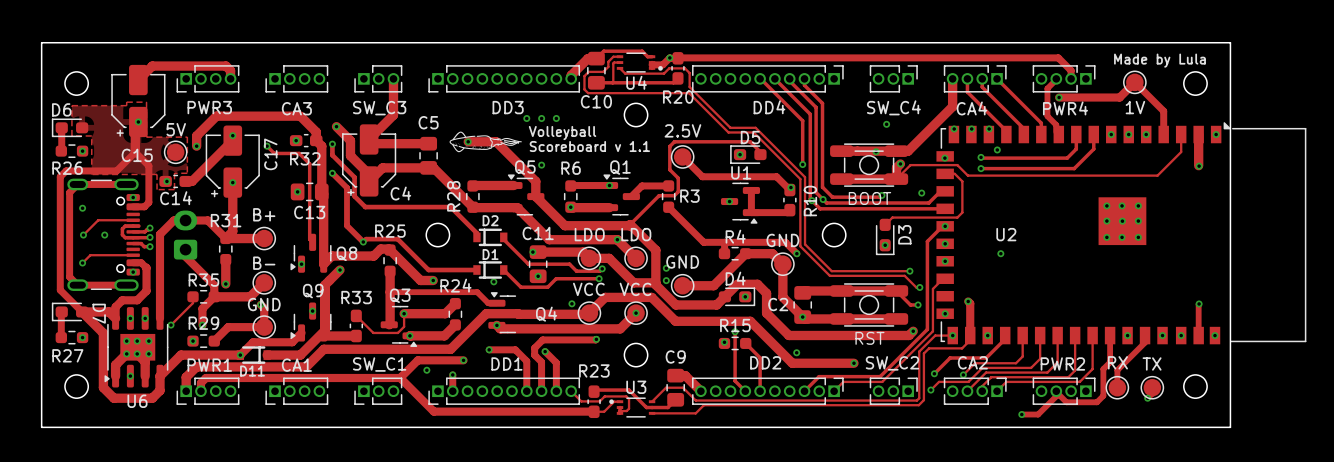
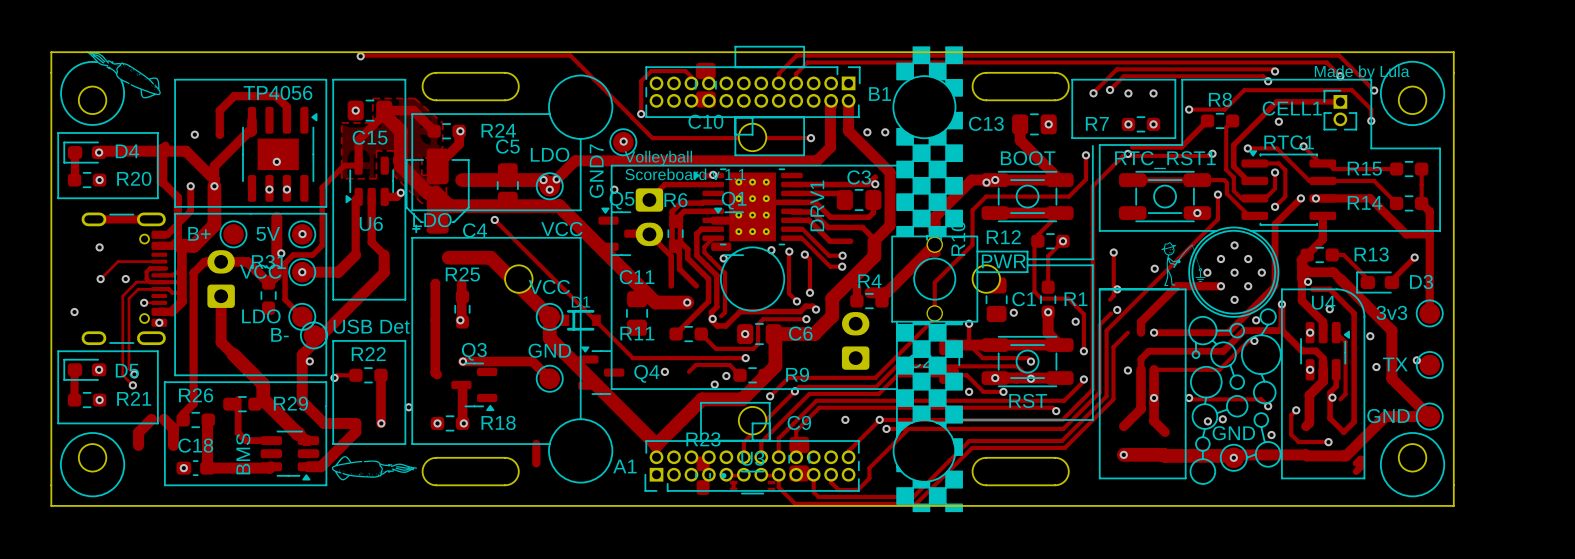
drawing: none -> [892, 46, 963, 237]
line: none -> (735, 46) (735, 67) (804, 67) (804, 46) (735, 46)
drawing: none -> [86, 51, 161, 99]
track: none -> (360, 55) (570, 55) (652, 138) (811, 138)
via: none -> (360, 56)
drawing: none -> [1380, 61, 1445, 126]
line: none -> (97, 62) (85, 62) (74, 67) (62, 83) (62, 102) (73, 118) (92, 125) (110, 119) (119, 110) (123, 99) (121, 80)
U4 footprint: [616, 52, 663, 73] -> [1300, 321, 1350, 381]
track: (620, 56) (613, 56) (603, 71) (588, 71) (584, 76) (584, 89) (588, 93) (689, 93) (728, 132) (753, 132) (800, 179) (800, 246) (829, 275) (904, 275) (916, 287) (919, 287) -> none
track: (652, 56) (647, 56) (642, 51) (603, 51) (596, 58) (587, 58) (571, 75) (571, 78) -> none
via: (669, 57) -> none
track: none -> (1275, 71) (1273, 69) (1116, 69) (1093, 93)
via: none -> (1275, 71)
board edge: none -> (436, 72) (508, 73) (516, 79) (518, 90) (514, 96) (506, 100) (432, 99) (425, 94) (422, 84) (426, 76) (436, 72)
board edge: none -> (986, 72) (1058, 73) (1066, 79) (1068, 90) (1064, 96) (1056, 100) (982, 99) (975, 94) (972, 84) (976, 76) (986, 72)
drawing: none -> [548, 74, 614, 140]
track: (620, 62) (613, 63) (612, 82) -> none
track: none -> (1340, 76) (1326, 62) (807, 62) (796, 73) (796, 83)
via: none -> (1340, 76)
C15 footprint: [111, 64, 166, 138] -> [347, 99, 393, 122]
track: (652, 64) (662, 64) (669, 57) (1058, 57) (1071, 70) (1071, 78) -> none
line: none -> (175, 79) (326, 79) (326, 206) (175, 206) (175, 79)
line: none -> (333, 79) (405, 79) (405, 299) (333, 299) (333, 79)
line: none -> (1072, 79) (1175, 79) (1175, 138) (1072, 138) (1072, 79)
track: none -> (1268, 81) (1263, 76) (1123, 76) (1110, 90)
via: none -> (1268, 81)
track: (620, 68) (625, 73) (663, 73) (669, 68) (684, 68) (689, 73) (689, 87) (730, 127) (755, 127) (805, 177) (805, 244) (831, 271) (909, 271) -> none
R20: (677, 68) -> none
track: none -> (691, 83) (691, 77) (685, 71) (651, 71) (641, 81) (641, 114)
track: none -> (778, 83) (778, 73) (796, 55) (1339, 55) (1374, 91)
via: none -> (1110, 90)
via: none -> (1374, 90)
B1: none -> (753, 92)
via: none -> (1093, 93)
via: none -> (1128, 93)
via: none -> (1153, 93)
PWR3: (207, 78) -> none
track: (230, 78) (230, 70) (225, 66) (152, 66) (138, 80) -> none
CA3: (296, 78) -> none
SW_C3: (378, 78) -> none
track: (393, 78) (393, 115) (369, 139) (373, 143) (428, 143) -> none
DD3: (504, 78) -> none
track: (677, 78) (673, 82) (596, 82) -> none
track: (760, 78) (802, 120) (802, 164) -> none
DD4: (767, 78) -> none
track: (774, 78) (810, 114) (810, 198) (820, 208) (945, 208) -> none
track: (789, 78) (816, 107) (816, 192) (826, 202) (928, 202) (940, 191) (945, 191) -> none
track: (804, 78) (804, 85) (822, 103) (822, 176) -> (1085, 155) (1085, 179) (1068, 196) (986, 196) (972, 210)
SW_C4: (893, 78) -> none
track: (952, 78) (952, 106) (908, 151) (896, 151) -> (1020, 124) (1020, 140) (1059, 180)
track: (967, 78) (967, 92) (1006, 131) (1006, 134) -> none
CA4: (975, 78) -> none
track: (982, 78) (982, 87) (1023, 128) (1023, 134) -> none
track: (997, 78) (1041, 123) (1041, 134) -> none
track: (1056, 78) (1047, 88) (1047, 116) (1056, 125) (1056, 132) -> none
PWR4: (1064, 78) -> none
zone outline: none -> (372, 98) (372, 122) (341, 122) (341, 178) (376, 178) (376, 150) (393, 150) (393, 175) (421, 203) (446, 203) (446, 175) (421, 175) (421, 157) (432, 157) (442, 147) (442, 122) (414, 98) (372, 98)
U4 name position: U4 (636, 82) -> U4 (1323, 302)
1V: (1134, 82) -> none
track: none -> (831, 100) (830, 147) (817, 160) (575, 160) (549, 186) (543, 180) (462, 180)
track: none -> (848, 100) (848, 131) (890, 172) (890, 225) (874, 241)
track: none -> (1340, 101) (1276, 101) (1233, 145) (1233, 166) (1248, 180) (1254, 180)
track: none -> (1189, 109) (1224, 109) (1244, 90) (1352, 90) (1371, 109) (1371, 120)
via: none -> (1189, 109)
CELL1: none -> (1340, 110)
via: none -> (355, 110)
track: none -> (384, 114) (400, 131) (400, 165) (428, 193) (436, 193) (449, 206) (559, 206) (655, 302) (687, 302)
track: none -> (384, 114) (358, 140) (358, 165) (344, 165) (322, 187) (322, 245) (312, 255) (293, 255) (285, 263) (285, 299) (302, 316)
track: none -> (384, 114) (384, 110) (413, 110) (434, 131)
line: none -> (549, 114) (412, 114) (412, 210) (580, 210) (580, 138)
via: none -> (641, 114)
track: (1059, 97) (1119, 97) (1134, 82) (1163, 111) (1163, 134) -> none
via: (1059, 97) -> none
line: none -> (735, 117) (735, 155) (804, 155) (804, 117) (735, 117)
line: none -> (752, 117) (752, 134) (735, 134)
track: none -> (252, 120) (252, 131) (248, 131) (214, 166) (214, 186)
track: none -> (286, 120) (286, 106) (276, 96) (234, 96) (219, 110) (219, 134)
track: none -> (1207, 120) (1181, 146) (1132, 146)
R8: none -> (1220, 120)
track: none -> (1232, 120) (1226, 127) (1226, 169) (1233, 177) (1233, 190) (1241, 198) (1265, 198) (1275, 188) (1275, 172)
via: none -> (1278, 121)
via: none -> (1371, 120)
zone outline: (126, 102) (126, 105) (71, 105) (71, 135) (91, 135) (91, 174) (157, 174) (157, 189) (174, 189) (174, 173) (187, 173) (187, 137) (146, 137) (146, 102) (126, 102) -> none
via: none -> (1048, 124)
via: none -> (1128, 124)
R7: none -> (1140, 124)
via: none -> (1153, 124)
D6 name: D6 (61, 109) -> D4 (127, 151)
track: none -> (459, 131) (459, 144) (436, 167)
via: none -> (460, 131)
via: none -> (867, 132)
via: none -> (885, 132)
line: none -> (58, 132) (157, 132) (157, 198) (58, 198) (58, 132)
via: none -> (194, 134)
via: none -> (811, 138)
via: (541, 118) -> none
via: (556, 118) -> none
GND7: none -> (623, 142)
via: (138, 121) -> none
line: none -> (1092, 145) (1092, 259) (1027, 259)
track: none -> (1303, 146) (1320, 163) (1327, 163) (1333, 169) (1396, 169)
via: none -> (1303, 146)
via: (886, 124) -> none
track: none -> (1247, 148) (1276, 148) (1309, 180) (1374, 180) (1396, 203)
via: none -> (1247, 148)
track: (336, 126) (350, 140) (350, 155) (369, 174) (369, 181) (382, 167) (433, 167) (473, 207) (517, 207) (549, 239) (617, 239) (636, 258) -> none
via: (336, 126) -> none
track: none -> (99, 152) (185, 151) (214, 179) (214, 186)
via: none -> (99, 152)
via: (971, 128) -> none
via: (989, 128) -> none
track: none -> (1212, 153) (1210, 155) (1123, 155) (1092, 186) (1092, 389) (1062, 420) (879, 419) (848, 451) (848, 457)
via: none -> (1212, 153)
5V name position: 5V (176, 129) -> 5V (268, 233)
TP4056: none -> (279, 154)
via: none -> (1085, 155)
drawing: [449, 131, 522, 153] -> none
track: (1076, 134) (1076, 149) (1067, 158) (981, 157) -> none
track: (1093, 134) (1093, 149) (1074, 168) (981, 168) -> none
via: (1111, 134) -> none
via: (1128, 134) -> none
via: (1146, 134) -> none
track: (1181, 134) (1181, 152) (1157, 175) (967, 175) (957, 165) (910, 165) (896, 179) (896, 167) (900, 163) -> none
track: (1198, 134) (1199, 166) -> none
via: (1216, 134) -> none
track: none -> (1254, 163) (1278, 163) (1285, 170) (1285, 196) (1275, 206)
line: none -> (896, 165) (611, 165) (611, 389) (896, 389)
track: (232, 140) (191, 181) (185, 181) -> none
via: (296, 140) -> none
R32: (306, 140) -> none
track: (468, 141) (496, 141) (535, 181) (535, 196) (564, 225) (630, 224) -> none
via: (468, 141) -> none
track: none -> (1421, 169) (1421, 203) (1429, 211) (1429, 313)
track: (332, 144) (332, 155) (354, 177) (354, 196) (365, 207) (450, 207) (476, 233) (476, 237) -> none
via: (332, 144) -> none
via: none -> (1275, 172)
track: (196, 146) (196, 135) (216, 116) (300, 116) (316, 132) (316, 140) (321, 146) (323, 264) (331, 256) (373, 256) (380, 249) (389, 249) (420, 280) (433, 280) -> none
via: (196, 146) -> none
track: (267, 146) (274, 153) (299, 153) (309, 163) (309, 239) (312, 242) -> none
via: (267, 146) -> none
via: none -> (713, 174)
track: none -> (875, 177) (867, 184) (791, 184)
via: (997, 149) -> none
via: none -> (556, 179)
via: none -> (543, 180)
track: (759, 151) (750, 141) (674, 141) (669, 146) (669, 169) (678, 178) (678, 191) (674, 195) (659, 195) (630, 224) -> none
track: none -> (995, 180) (971, 180) (934, 217) (934, 244) (886, 292) (869, 292)
via: none -> (995, 180)
via: (876, 151) -> none
track: none -> (1132, 180) (1224, 180) (1226, 182) (1226, 193) (1249, 215) (1254, 215)
track: (135, 152) (116, 170) (66, 170) (60, 176) (60, 290) (82, 311) -> none
5V position: (175, 152) -> (302, 234)
via: none -> (986, 182)
track: none -> (713, 184) (664, 184) (649, 200)
D5: (748, 154) -> none
C15 name position: C15 (137, 155) -> C15 (370, 137)
track: none -> (190, 186) (190, 211) (167, 234) (159, 234)
via: none -> (190, 186)
via: none -> (214, 186)
LDO: none -> (549, 186)
track: (682, 156) (702, 176) (776, 176) (789, 190) -> none
2.5V: (682, 156) -> none
via: (981, 157) -> none
RTC1: none -> (1288, 188)
via: (944, 158) -> none
via: none -> (269, 189)
via: none -> (286, 189)
via: none -> (549, 189)
via: none -> (614, 189)
C17: (232, 161) -> none
track: none -> (400, 192) (396, 196) (384, 196)
via: none -> (400, 192)
track: none -> (791, 193) (838, 193) (844, 200)
via: (900, 163) -> none
track: none -> (1217, 194) (1217, 219) (1106, 330) (1106, 396) (1061, 441) (969, 441) (913, 496) (818, 496) (813, 492) (813, 474)
via: none -> (1217, 194)
via: (802, 164) -> none
track: none -> (358, 196) (355, 199) (355, 255) (338, 272) (302, 272)
track: none -> (371, 196) (371, 242) (384, 255) (384, 272) (302, 354) (302, 401) (324, 423) (355, 423) (355, 431) (321, 466) (308, 466)
via: (541, 165) -> none
RTC_RST1: none -> (1165, 196)
track: none -> (1300, 198) (1275, 224) (1275, 285) (1228, 332) (1154, 332)
via: none -> (1300, 198)
via: none -> (1315, 198)
track: none -> (1322, 198) (1370, 198) (1406, 234) (1429, 234)
via: (1199, 166) -> none
R26 name: R26 (67, 168) -> R20 (134, 178)
C3: none -> (859, 200)
track: none -> (873, 200) (873, 212) (868, 217) (830, 217) (815, 202) (757, 202) (739, 220) (713, 220)
via: (981, 168) -> none
track: none -> (713, 202) (680, 203) (672, 211) (672, 245) (679, 252) (679, 269) (696, 285)
R14: none -> (1409, 203)
track: (332, 173) (347, 187) (347, 225) (363, 242) (366, 239) (397, 239) (428, 270) (476, 270) -> none
via: (332, 173) -> none
DRV1: none -> (748, 206)
track: (945, 173) (954, 173) (962, 181) (962, 212) (957, 217) (892, 217) (885, 224) -> none
via: none -> (1275, 206)
track: none -> (713, 211) (684, 211) (680, 215) (680, 241) (687, 249) (687, 258) (708, 278) (708, 301) (676, 334)
track: none -> (791, 211) (812, 212) (828, 227) (862, 227) (874, 241)
line: none -> (175, 213) (326, 213) (326, 375) (175, 375) (175, 213)
track: none -> (1059, 213) (1037, 235) (1037, 241) (1034, 244) (1034, 291) (1041, 298) (1068, 298) (1083, 314) (1083, 351)
via: none -> (1197, 213)
via: (166, 181) -> none
C14: (175, 181) -> none
track: none -> (1322, 215) (1322, 239) (1301, 260) (1301, 300) (1323, 321) (1323, 332)
via: (232, 182) -> none
part: none -> (649, 217)
track: (77, 184) (69, 192) (69, 277) (77, 285) (126, 285) -> none
track: none -> (494, 219) (632, 358) (745, 358)
via: none -> (494, 219)
text: none -> LDO (432, 220)
track: (513, 185) (472, 185) -> none
track: (609, 185) (570, 185) -> none
via: (609, 185) -> none
track: (668, 185) (642, 185) (631, 196) -> none
track: none -> (791, 220) (809, 220) (830, 241) (850, 241)
via: (790, 187) -> none
track: (822, 187) (832, 197) (880, 197) (881, 195) -> (972, 222) (972, 244) (934, 282) (934, 318) (875, 377) (788, 377) (770, 396)
track: (751, 190) (751, 212) (787, 212) (789, 210) -> none
drawing: none -> [1161, 226, 1282, 485]
via: (297, 191) -> none
C13 position: (309, 191) -> (1034, 124)
text: none -> VCC (561, 229)
track: none -> (713, 229) (701, 229) (696, 233) (696, 255) (706, 265)
track: none -> (791, 229) (802, 229) (829, 255) (842, 255)
via: (921, 193) -> none
line: none -> (1216, 230) (1099, 230) (1099, 145) (1182, 145) (1182, 79) (1371, 79) (1371, 148) (1440, 148) (1440, 230) (1250, 230)
via: (881, 195) -> none
via: none -> (302, 234)
R28: (472, 196) -> none
R3: (668, 196) -> none
via: (133, 197) -> none
track: none -> (649, 234) (671, 256) (671, 285)
BOOT name position: BOOT (869, 198) -> BOOT (1028, 158)
via: (823, 199) -> none
track: none -> (713, 238) (704, 246) (704, 252) (709, 258)
track: none -> (791, 238) (801, 238) (830, 266) (842, 266)
via: (812, 200) -> none
via: (729, 201) -> none
track: none -> (874, 241) (874, 256) (832, 298) (832, 316) (814, 334) (777, 334) (775, 335) (775, 366) (742, 399) (702, 399) (656, 444) (549, 338) (549, 316) (490, 257) (448, 257)
R12: none -> (1050, 241)
track: none -> (1062, 241) (1048, 256) (1048, 287)
via: none -> (1062, 241)
U1: (740, 203) -> none
via: (1106, 205) -> none
via: (1122, 205) -> none
via: (1138, 205) -> none
via: none -> (1234, 245)
track: (570, 207) (609, 207) -> none
via: (570, 207) -> none
drawing: none -> [720, 246, 785, 312]
track: (668, 207) (703, 242) (785, 242) (796, 253) -> none
via: none -> (771, 250)
track: none -> (789, 251) (789, 293) (796, 301)
via: none -> (789, 251)
line: none -> (977, 251) (1027, 251) (1027, 272) (977, 272)
C13 name position: C13 (309, 212) -> C13 (986, 123)
track: none -> (1113, 252) (1113, 296) (1110, 299)
via: none -> (1113, 252)
via: none -> (281, 253)
B+ name position: B+ (264, 214) -> B+ (199, 233)
track: none -> (804, 254) (809, 259) (809, 292)
via: none -> (804, 254)
R13: none -> (1319, 255)
track: none -> (1332, 255) (1343, 255) (1367, 279) (1367, 282)
via: none -> (842, 255)
track: none -> (1414, 257) (1391, 282)
via: none -> (1414, 257)
track: none -> (710, 258) (725, 273) (725, 312) (721, 316)
via: none -> (723, 258)
via: none -> (1220, 259)
via: none -> (1248, 259)
track: (173, 220) (159, 234) (159, 318) -> (207, 261) (204, 261) (193, 272) (193, 403) (183, 414) (183, 419)
via: (1106, 221) -> none
via: (1122, 221) -> none
via: (1138, 221) -> none
track: none -> (706, 265) (716, 275) (716, 306) (711, 312) (711, 320) (717, 325) (725, 325) (740, 311) (800, 311) (805, 306) (812, 306) (816, 309)
line: none -> (1027, 265) (1092, 265) (1092, 419) (962, 419)
track: (630, 224) (655, 250) (655, 284) (675, 304) (716, 304) (737, 284) (757, 284) (766, 293) (766, 313) (788, 335) (908, 335) (913, 331) -> none
via: none -> (842, 266)
track: (945, 226) (942, 226) (927, 241) (927, 329) (880, 376) (819, 376) (804, 391) -> none
via: (945, 226) -> none
via: none -> (1154, 268)
via: (150, 228) -> none
VCC: none -> (302, 272)
via: none -> (302, 272)
via: none -> (1207, 272)
via: none -> (1234, 272)
via: none -> (1261, 272)
U2: (1121, 233) -> none
PWR: none -> (934, 279)
track: none -> (1301, 279) (1301, 265) (1308, 272) (1333, 272) (1391, 330) (1391, 378) (1429, 416) (1385, 416) (1346, 455) (1236, 454) (1233, 457) (1231, 455) (1123, 454)
D3 rotation: 0° (885, 236) -> 90° clockwise (1377, 282)
D3 position: (885, 236) -> (1377, 282)
track: none -> (150, 282) (136, 282) (122, 296) (122, 375) (132, 385)
via: (150, 237) -> none
D2: (490, 237) -> none
track: (503, 237) (528, 264) (569, 264) (576, 271) (599, 271) (602, 268) -> none
via: (1122, 237) -> none
via: (1138, 237) -> none
track: (225, 238) (264, 238) -> none
B+ position: (264, 238) -> (233, 234)
track: none -> (435, 283) (435, 372) (437, 374)
track: none -> (461, 283) (460, 320)
via: (617, 239) -> none
track: none -> (1220, 286) (1176, 286) (1140, 321) (1140, 332)
via: none -> (1220, 286)
via: none -> (1248, 286)
via: (363, 242) -> none
track: none -> (159, 289) (138, 289) (129, 298) (129, 369) (134, 374)
line: none -> (1099, 289) (1185, 289) (1185, 478) (1099, 478) (1099, 289)
line: none -> (1281, 289) (1281, 478) (1364, 478) (1364, 316) (1361, 304) (1354, 295) (1343, 290) (1281, 289)
track: none -> (1312, 289) (1330, 289) (1354, 313) (1354, 421) (1343, 432) (1330, 418) (1330, 392) (1336, 386) (1336, 369)
via: (885, 245) -> none
via: (150, 246) -> none
via: none -> (809, 292)
via: (532, 252) -> none
track: (538, 252) (583, 252) (589, 258) (609, 258) (633, 282) (655, 282) -> none
C1: none -> (996, 299)
R1: none -> (1048, 299)
via: none -> (1234, 299)
Q8: (310, 253) -> none
via: (796, 253) -> none
via: (1000, 253) -> none
via: none -> (687, 302)
via: none -> (796, 301)
track: (120, 255) (90, 255) (82, 263) -> none
via: none -> (144, 302)
track: (185, 256) (214, 285) (214, 296) -> (221, 304) (221, 342) (263, 384) (263, 399) (297, 433) (308, 440)
track: none -> (1281, 304) (1281, 330)
via: none -> (1281, 304)
LDO: (589, 258) -> none
LDO: (636, 258) -> none
track: (225, 259) (225, 283) -> none
via: none -> (816, 309)
via: none -> (1329, 309)
track: (141, 262) (146, 267) (146, 290) (137, 300) (122, 300) (115, 307) (115, 318) (109, 311) (82, 311) -> (168, 311) (171, 311) (181, 301) (181, 248) (179, 245) (193, 245) (214, 225) (214, 186)
via: none -> (74, 312)
via: (82, 263) -> none
B- name position: B- (264, 263) -> B- (279, 334)
via: none -> (1013, 312)
via: none -> (1048, 312)
via: (301, 264) -> none
GND: (782, 264) -> none
track: none -> (1111, 313) (1099, 324) (1099, 392) (1063, 428) (886, 428)
3v3: none -> (1429, 313)
LDO: none -> (302, 316)
VCC: none -> (549, 316)
via: (666, 268) -> none
track: none -> (806, 319) (763, 319) (758, 324) (758, 344) (753, 348) (715, 348) (701, 334)
via: none -> (806, 319)
track: (340, 270) (324, 285) (324, 336) (356, 336) -> none
via: (340, 270) -> none
via: none -> (460, 320)
track: (503, 270) (520, 287) (547, 287) (556, 278) (599, 278) -> none
drawing: none -> [892, 321, 963, 513]
via: none -> (1256, 320)
track: (390, 271) (389, 324) -> none
line: none -> (896, 321) (896, 436)
track: none -> (969, 323) (969, 344) (982, 358) (1027, 358) (1030, 361)
via: none -> (969, 323)
line: none -> (1268, 324) (1261, 335)
text: none -> USB Det (371, 326)
via: (538, 276) -> none
via: (599, 278) -> none
track: (945, 278) (932, 288) (932, 331) (882, 381) (843, 381) (834, 391) -> none
line: none -> (1216, 330) (1230, 330)
track: none -> (1281, 330) (1244, 330) (1223, 351) (1148, 351) (1140, 359) (1140, 409) (1123, 426)
track: none -> (1281, 330) (1302, 350) (1315, 350) (1323, 358) (1323, 381) (1309, 395) (1309, 422) (1305, 426)
via: (433, 280) -> none
via: (666, 280) -> none
track: none -> (1127, 332) (1113, 347) (1113, 399) (1064, 447) (972, 447) (916, 503) (795, 503) (778, 487) (778, 474)
via: none -> (1154, 332)
via: none -> (1310, 332)
track: none -> (1336, 332) (1345, 341) (1345, 394) (1340, 399)
via: (493, 281) -> none
R11: none -> (688, 334)
via: none -> (745, 334)
C6: none -> (759, 334)
track: (264, 282) (250, 296) (214, 296) -> none
via: (225, 283) -> none
via: none -> (1370, 336)
track: (682, 285) (713, 285) (745, 253) (772, 253) (782, 264) (782, 297) (804, 318) (841, 318) -> none
GND: (682, 285) -> none
line: none -> (333, 340) (333, 444) (405, 444) (405, 340) (333, 340)
part: none -> (855, 340)
via: (919, 287) -> none
line: none -> (1213, 340) (1216, 344)
track: none -> (1254, 340) (1248, 340) (1219, 369) (1154, 369) (1154, 421) (1165, 432)
via: none -> (1254, 340)
line: none -> (1195, 342) (1195, 351)
track: (896, 290) (910, 304) (918, 304) -> (1059, 345) (1048, 333) (1048, 312)
track: (390, 292) (477, 292) (488, 303) (496, 303) -> none
line: none -> (58, 351) (58, 423) (157, 423) (157, 351) (58, 351)
track: (193, 296) (193, 303) (171, 325) -> none
R35: (203, 296) -> none
track: (214, 296) (202, 308) (202, 325) -> none
D4: (736, 296) -> none
via: (745, 296) -> none
via: none -> (1083, 351)
track: (968, 301) (970, 303) (970, 340) (962, 348) (929, 348) (923, 353) (923, 400) (918, 405) (703, 405) (695, 413) (652, 413) -> none
via: (968, 301) -> none
via: none -> (745, 358)
track: (455, 303) (445, 313) (404, 313) (404, 326) (397, 332) (373, 332) (356, 315) -> none
via position: (571, 303) -> (664, 371)
track: (1199, 303) (1198, 335) -> none
track: (260, 304) (264, 308) (264, 327) (228, 327) (214, 341) -> none
track: none -> (462, 361) (532, 361) (549, 378)
via: none -> (1030, 361)
via: (918, 304) -> none
U6 footprint: [104, 307, 169, 388] -> [345, 156, 394, 207]
line: none -> (1230, 364) (1233, 375)
via: none -> (1376, 367)
track: (82, 311) (103, 333) (103, 387) (113, 398) (152, 398) (159, 390) (159, 376) (181, 355) (240, 355) (253, 342) (292, 342) (301, 332) -> none
via: none -> (99, 369)
via: (312, 311) -> none
via: none -> (1310, 369)
via: none -> (1127, 370)
D7 name: D7 (99, 313) -> D5 (127, 370)
via position: (404, 313) -> (462, 361)
track: none -> (688, 371) (695, 364) (729, 364) (740, 375)
VCC: (589, 313) -> none
track: (636, 313) (620, 328) (500, 328) (496, 325) -> none
VCC: (636, 313) -> none
via: (636, 313) -> none
via: (945, 313) -> none
R24 rotation: 0° (455, 314) -> 90° clockwise (446, 131)
R24 position: (455, 314) -> (446, 131)
via: none -> (134, 374)
line: none -> (1261, 374) (1264, 381)
track: none -> (355, 375) (337, 375) (334, 377)
R22: none -> (368, 375)
track: none -> (380, 375) (380, 423)
R9: none -> (752, 375)
via: none -> (726, 376)
via: (802, 317) -> none
via: (130, 318) -> none
via: (145, 318) -> none
via: none -> (334, 377)
via: none -> (995, 378)
GND: none -> (549, 378)
track: none -> (1030, 378) (1017, 366) (896, 366) (876, 387) (799, 387) (794, 391)
via: none -> (1030, 378)
track: none -> (1083, 379) (1064, 400) (816, 400) (778, 438) (778, 457)
via: none -> (1083, 379)
Q9: (310, 322) -> none
R29 name position: R29 (203, 323) -> R29 (290, 403)
track: (455, 324) (444, 335) (409, 335) -> none
via: none -> (714, 384)
via: none -> (132, 385)
via: (171, 325) -> none
via: (202, 325) -> none
R33: (356, 325) -> none
via: (496, 325) -> none
R15 name position: R15 (735, 325) -> R15 (1364, 168)
GND: (264, 327) -> none
track: none -> (462, 387) (462, 423)
track: (324, 330) (300, 355) (267, 355) -> none
track: none -> (794, 391) (743, 442) (743, 457)
via: none -> (794, 391)
via: none -> (969, 391)
track: none -> (1003, 391) (983, 391) (966, 375) (897, 375) (878, 393) (809, 393) (761, 442) (761, 457)
via: none -> (1003, 391)
track: (735, 331) (735, 381) (745, 391) -> none
via: (735, 331) -> none
via: (913, 331) -> none
via: none -> (770, 396)
via: (409, 335) -> none
track: (952, 335) (935, 335) (919, 351) (919, 398) (916, 400) (695, 400) (683, 387) (666, 387) (652, 401) -> none
via: (952, 335) -> none
via: none -> (1154, 397)
via: (987, 335) -> none
track: (1005, 335) (1005, 339) (986, 358) (950, 358) (934, 373) -> none
track: none -> (1189, 397) (1261, 399) (1268, 406)
via: none -> (1189, 397)
line: none -> (1206, 397) (1204, 404)
track: (1022, 335) (1022, 356) (1015, 363) (975, 363) (963, 374) -> none
track: (1040, 335) (1040, 358) (1031, 367) (982, 367) (968, 381) (939, 381) (930, 390) -> none
track: (1057, 335) (1057, 362) (1047, 372) (986, 372) (967, 391) -> none
track: (1075, 335) (1075, 370) (1068, 377) (991, 377) (982, 386) (982, 391) -> none
track: (1092, 335) (1092, 369) (1079, 381) (1006, 381) (997, 391) -> none
track: (1110, 335) (1110, 362) (1103, 369) (1103, 395) (1096, 402) (1066, 402) (1056, 392) -> none
track: (1145, 335) (1145, 342) (1117, 370) (1117, 387) -> none
via: (1162, 335) -> none
via: (1181, 335) -> none
via: (1214, 335) -> none
track: none -> (238, 399) (238, 432) (245, 440) (271, 440)
line: none -> (701, 402) (701, 440) (769, 440) (769, 402) (701, 402)
track: (596, 339) (542, 339) (534, 348) (534, 355) (541, 362) (541, 391) -> none
via: (596, 339) -> none
via: (126, 341) -> none
via: (137, 341) -> none
via: (148, 341) -> none
via: (193, 341) -> none
line: none -> (326, 406) (326, 485) (164, 485) (164, 382) (326, 382) (326, 406)
via: (724, 342) -> none
via: none -> (1268, 406)
via: none -> (408, 407)
R15 position: (735, 343) -> (1409, 169)
track: (745, 343) (760, 357) (760, 391) -> none
line: none -> (1226, 409) (1217, 413)
track: none -> (1056, 411) (1052, 407) (819, 407) (796, 430) (796, 457)
via: none -> (1056, 411)
track: none -> (1296, 410) (1291, 415) (1291, 434) (1298, 441) (1328, 441)
via: none -> (1296, 410)
track: (489, 349) (515, 349) (526, 361) (526, 391) -> none
via: (489, 349) -> none
track: (545, 351) (556, 362) (556, 391) -> none
via: (545, 351) -> none
GND: none -> (1429, 416)
via: (796, 352) -> none
via: (126, 353) -> none
via: (137, 353) -> none
via: (148, 353) -> none
drawing: none -> [548, 418, 614, 484]
line: none -> (580, 419) (580, 237) (412, 237) (412, 444) (549, 444)
via: none -> (1222, 419)
R26: none -> (195, 419)
track: none -> (208, 419) (207, 468) (271, 466)
via: none -> (845, 419)
via: none -> (879, 419)
R27 name: R27 (67, 355) -> R21 (134, 398)
via: (240, 355) -> none
D11: (253, 355) -> none
via: none -> (1207, 421)
via: none -> (381, 423)
via: none -> (437, 423)
R18: none -> (450, 423)
via: none -> (463, 423)
line: none -> (769, 423) (752, 423) (752, 440)
track: (463, 360) (417, 360) (400, 377) -> none
via: (463, 360) -> none
line: none -> (1261, 426) (1264, 441)
via: none -> (886, 428)
line: none -> (1204, 428) (1202, 437)
track: none -> (907, 430) (869, 468) (869, 478) (857, 490) (838, 490) (831, 482) (831, 474)
track: (853, 363) (792, 363) (750, 321) (675, 321) (651, 297) (605, 297) (588, 314) (486, 313) (450, 349) (323, 349) (306, 366) (196, 366) (186, 377) (186, 391) -> none
via: (853, 363) -> none
TX name position: TX (1152, 363) -> TX (1395, 364)
drawing: none -> [60, 432, 125, 498]
drawing: none -> [1380, 432, 1445, 498]
via: none -> (1271, 435)
via: (426, 370) -> none
via: (934, 373) -> none
via: none -> (1328, 442)
via: (452, 374) -> none
via: (963, 374) -> none
track: (675, 375) (685, 375) (700, 391) -> none
via: (130, 376) -> none
track: (400, 377) (205, 377) (200, 382) (200, 391) -> none
track: (400, 377) (433, 411) (594, 411) -> none
line: none -> (1202, 450) (1202, 459)
line: none -> (1255, 454) (1246, 457)
BMS: none -> (289, 455)
via: none -> (1123, 454)
drawing: none -> [331, 456, 418, 481]
board edge: none -> (436, 457) (508, 458) (516, 464) (518, 475) (514, 481) (506, 485) (432, 484) (425, 479) (422, 469) (426, 461) (436, 457)
board edge: none -> (986, 457) (1058, 458) (1066, 464) (1068, 475) (1064, 481) (1056, 485) (982, 484) (975, 479) (972, 469) (976, 461) (986, 457)
GND: none -> (1233, 457)
via: none -> (1233, 457)
RX: (1117, 387) -> none
TX position: (1152, 387) -> (1429, 364)
via: (930, 390) -> none
PWR1: (207, 391) -> none
CA1: (296, 391) -> none
SW_C1: (378, 391) -> none
DD1: (504, 391) -> none
track: (571, 391) (581, 401) (599, 401) (604, 396) (626, 396) (629, 399) (629, 408) (618, 412) -> none
track: (594, 391) (595, 390) (629, 390) (646, 407) (667, 407) (675, 399) -> none
DD2: (767, 391) -> none
SW_C2: (893, 391) -> none
CA2: (975, 391) -> none
track: (1056, 391) (1056, 396) (1038, 414) (1021, 414) -> none
PWR2: (1064, 391) -> none
A1: none -> (752, 465)
via: none -> (183, 468)
C18: none -> (195, 468)
via: (1147, 398) -> none
track: (620, 401) (614, 401) (604, 411) (594, 411) -> none
via: (1021, 414) -> none

